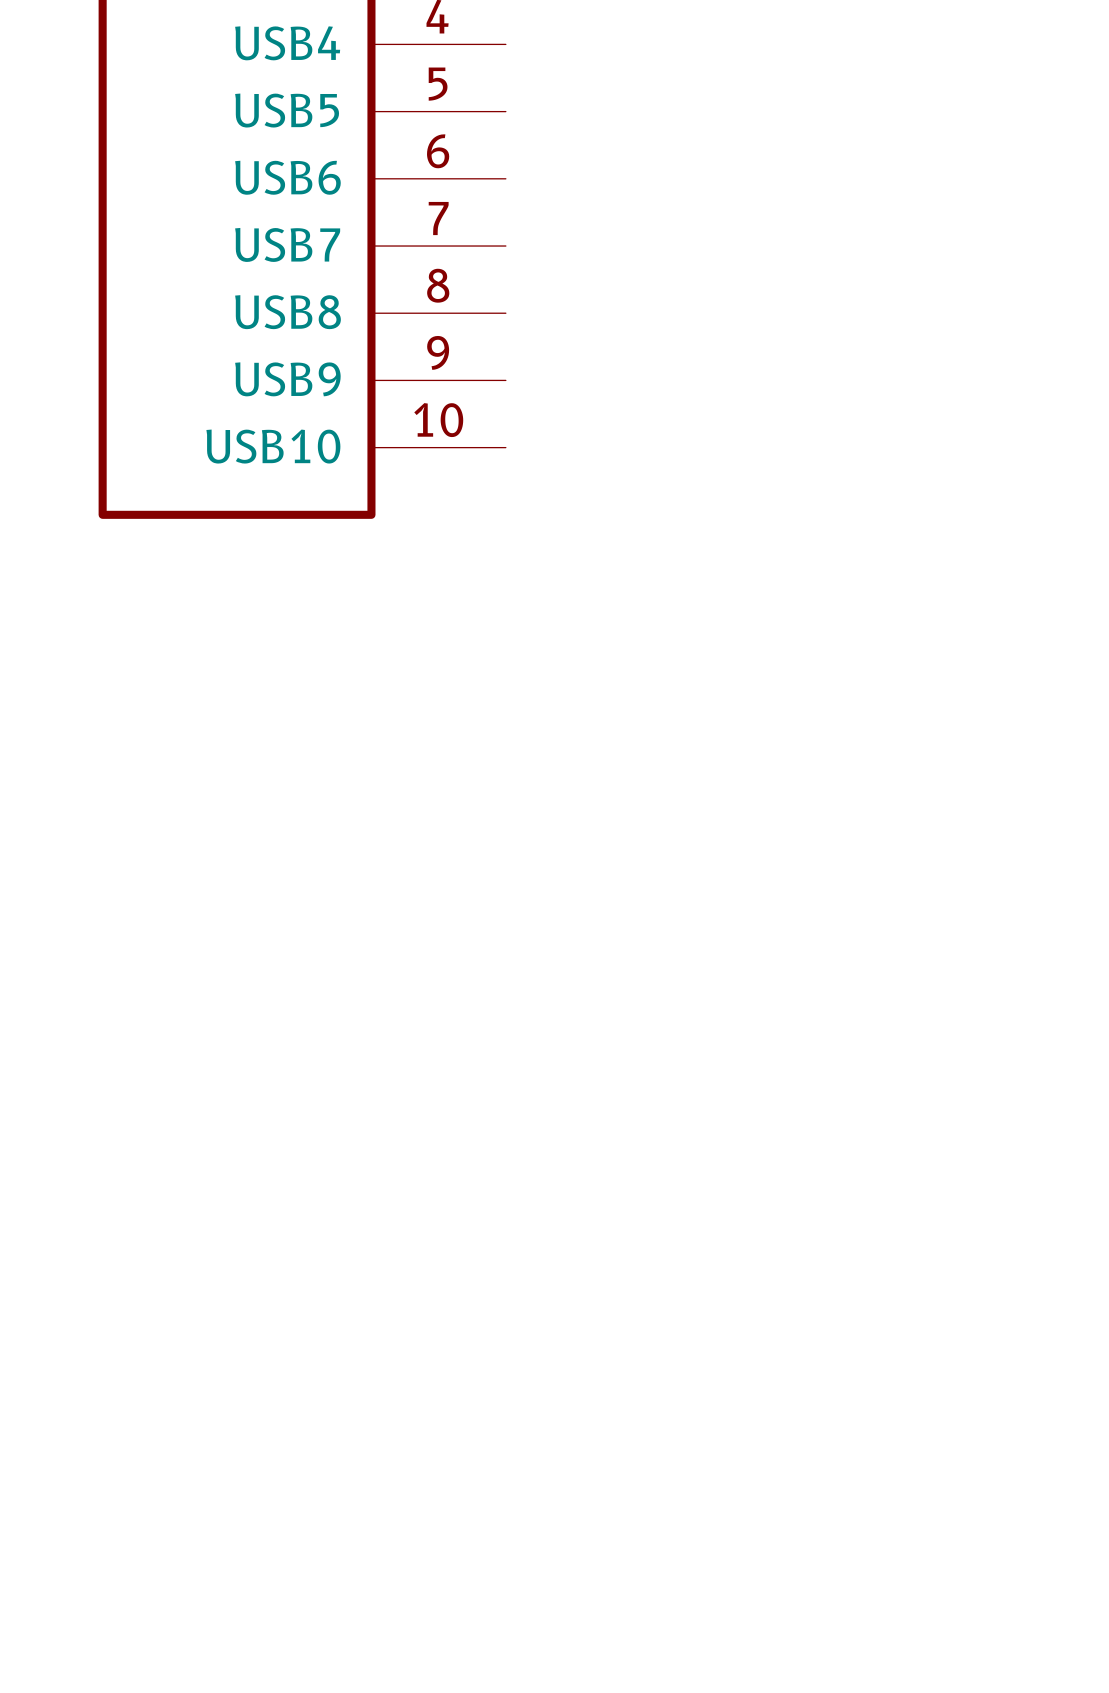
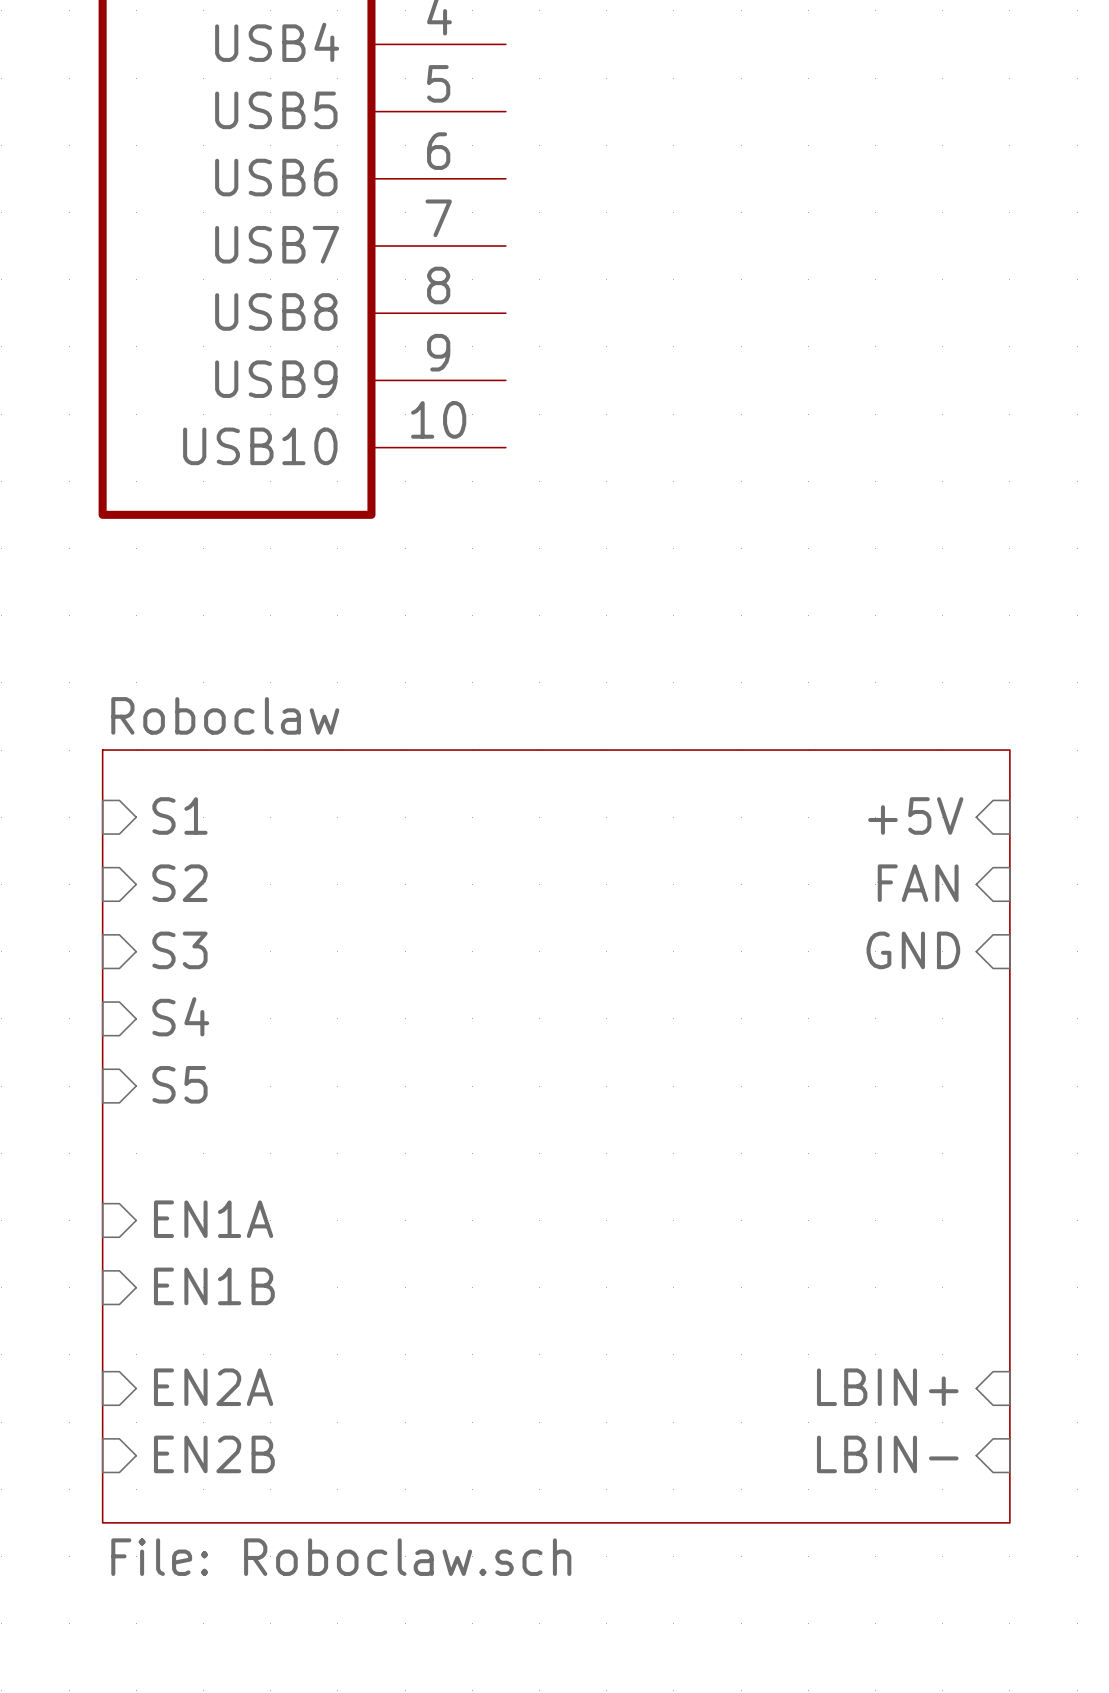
sheet pin: none -> S1 (179, 815)
sheet pin: none -> +5V (915, 815)
sheet pin: none -> S2 (179, 883)
sheet pin: none -> FAN (918, 883)
sheet pin: none -> S3 (179, 950)
sheet pin: none -> GND (913, 950)
sheet pin: none -> S4 (180, 1016)
sheet pin: none -> S5 (179, 1084)
sheet Roboclaw: none -> File: Roboclaw.sch (556, 1136)
sheet pin: none -> EN1A (213, 1219)
sheet pin: none -> EN1B (214, 1286)
sheet pin: none -> EN2A (213, 1387)
sheet pin: none -> LBIN+ (887, 1387)
sheet pin: none -> EN2B (214, 1454)
sheet pin: none -> LBIN- (887, 1454)

